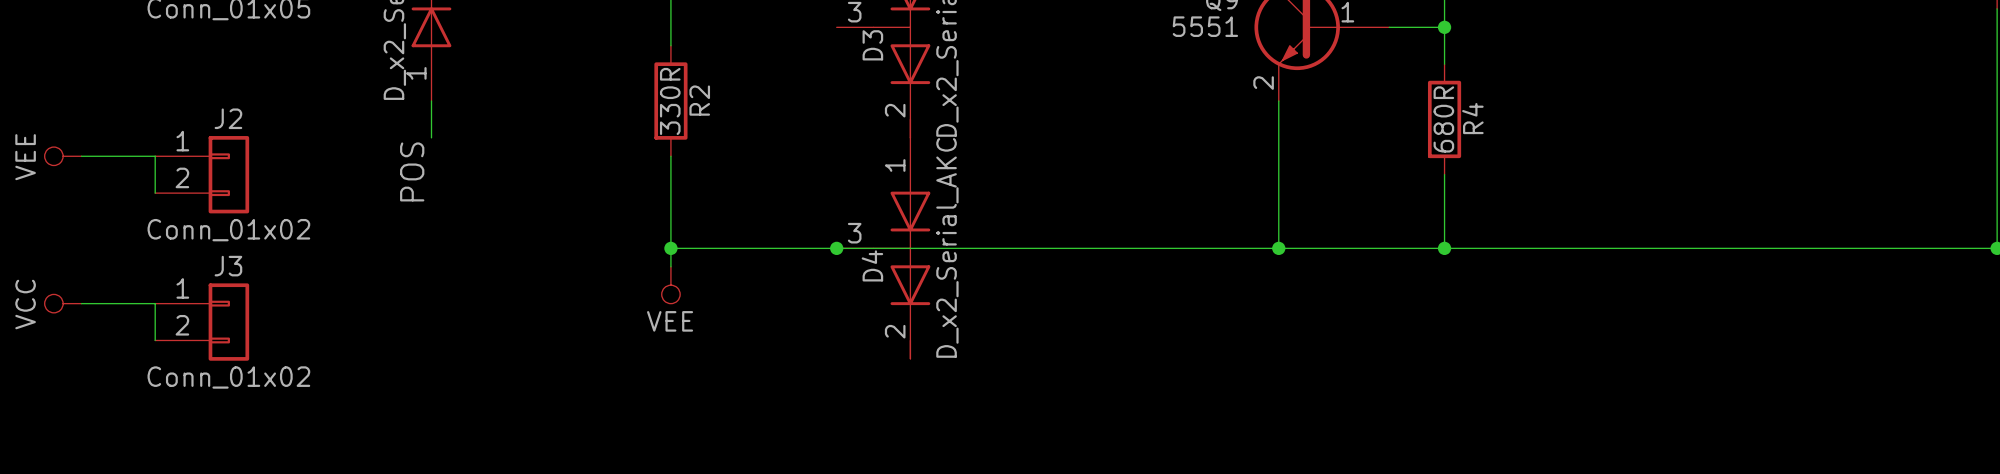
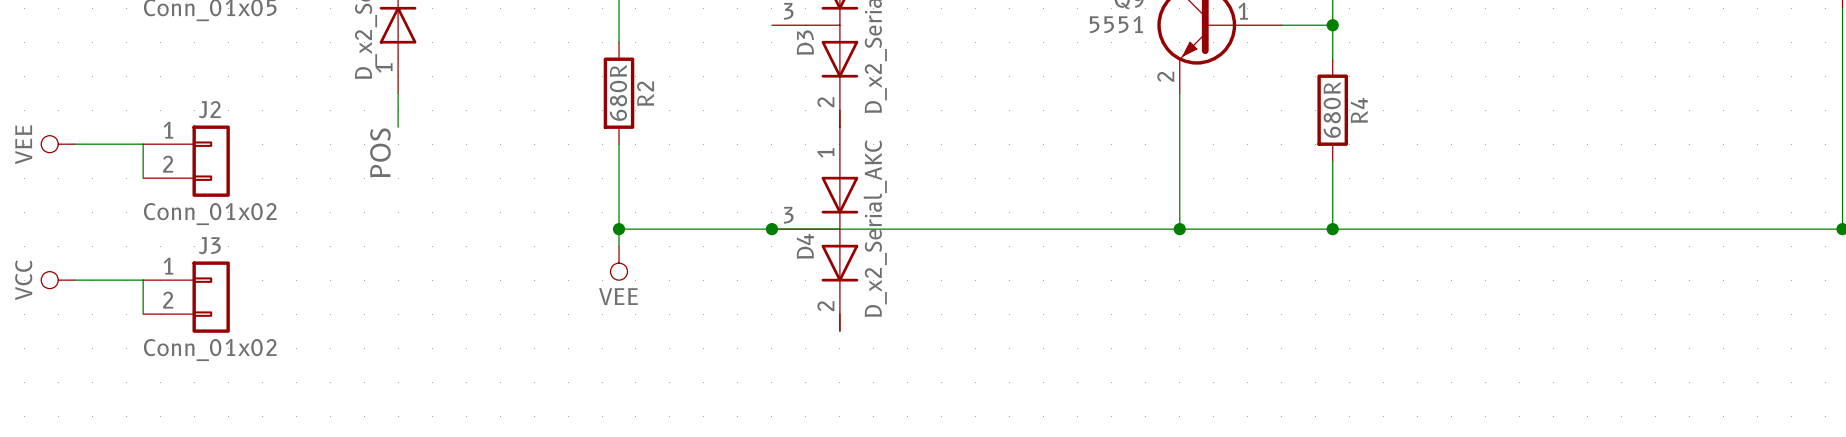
R2 value: 330R (670, 101) -> 680R (618, 92)

